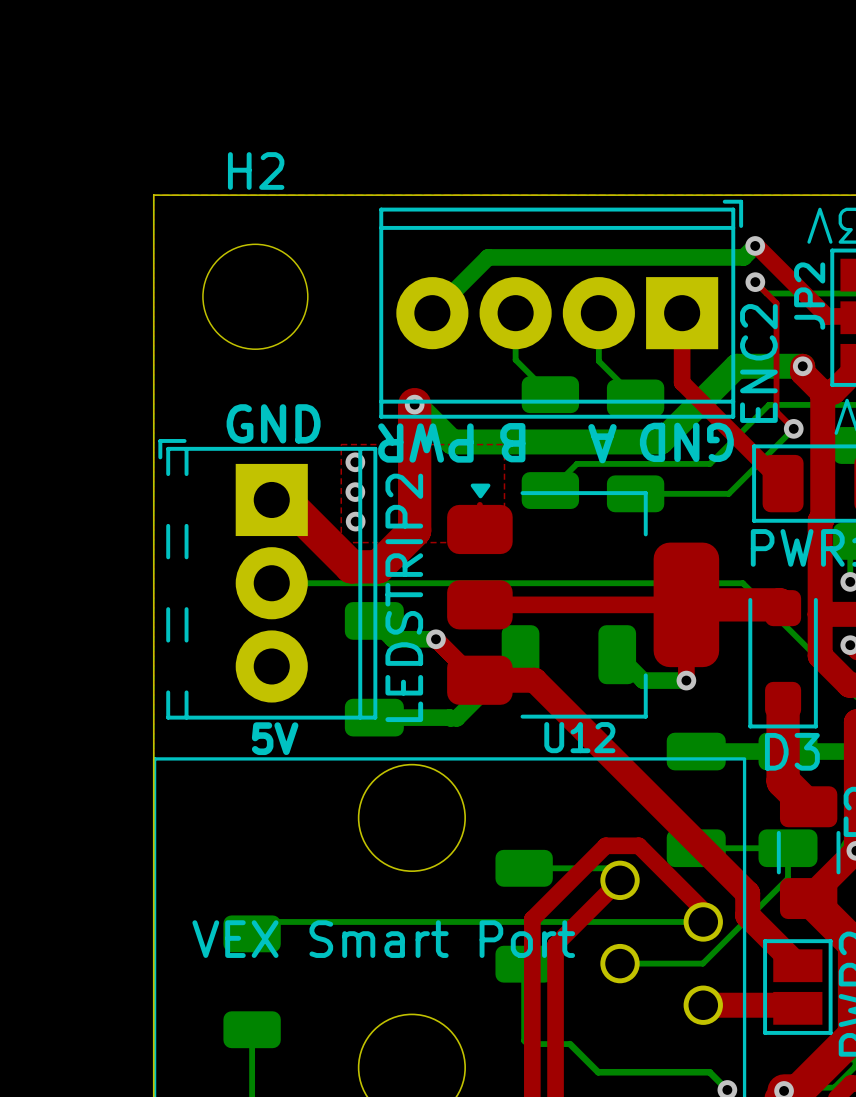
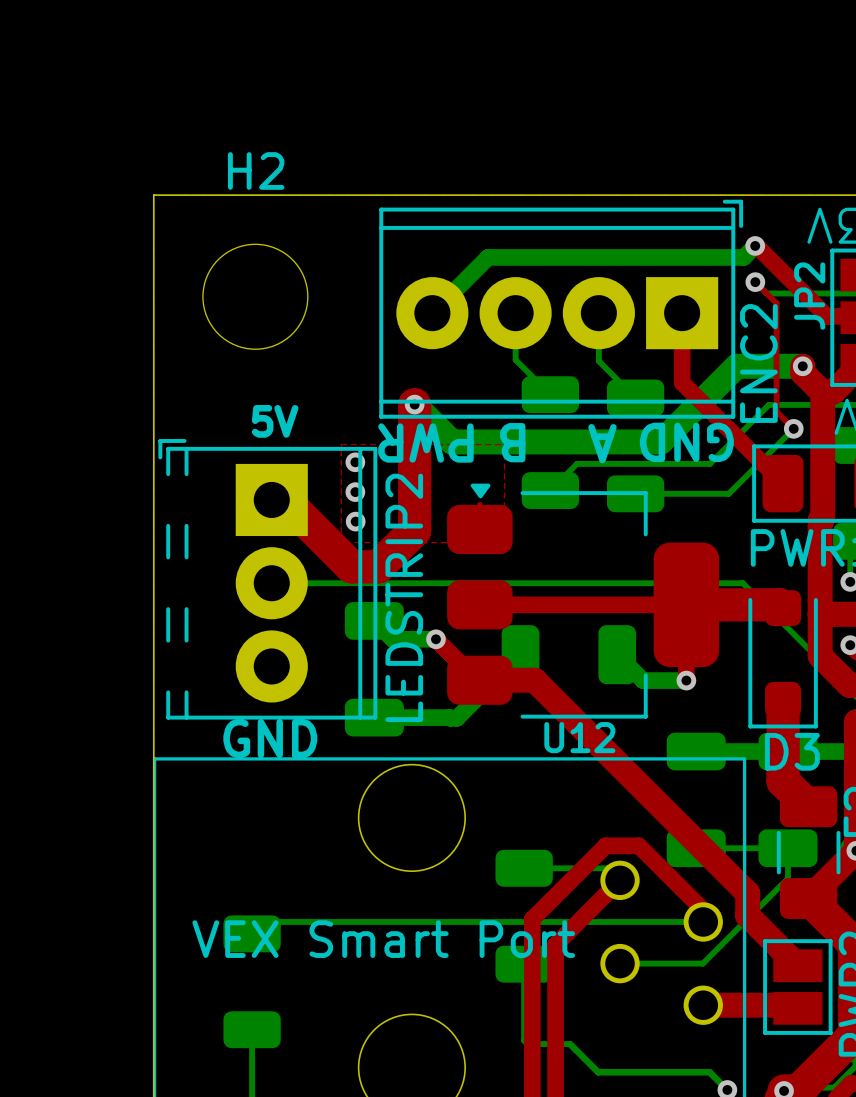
text position: GND (273, 423) -> GND (270, 738)
text position: 5V (275, 738) -> 5V (275, 421)

